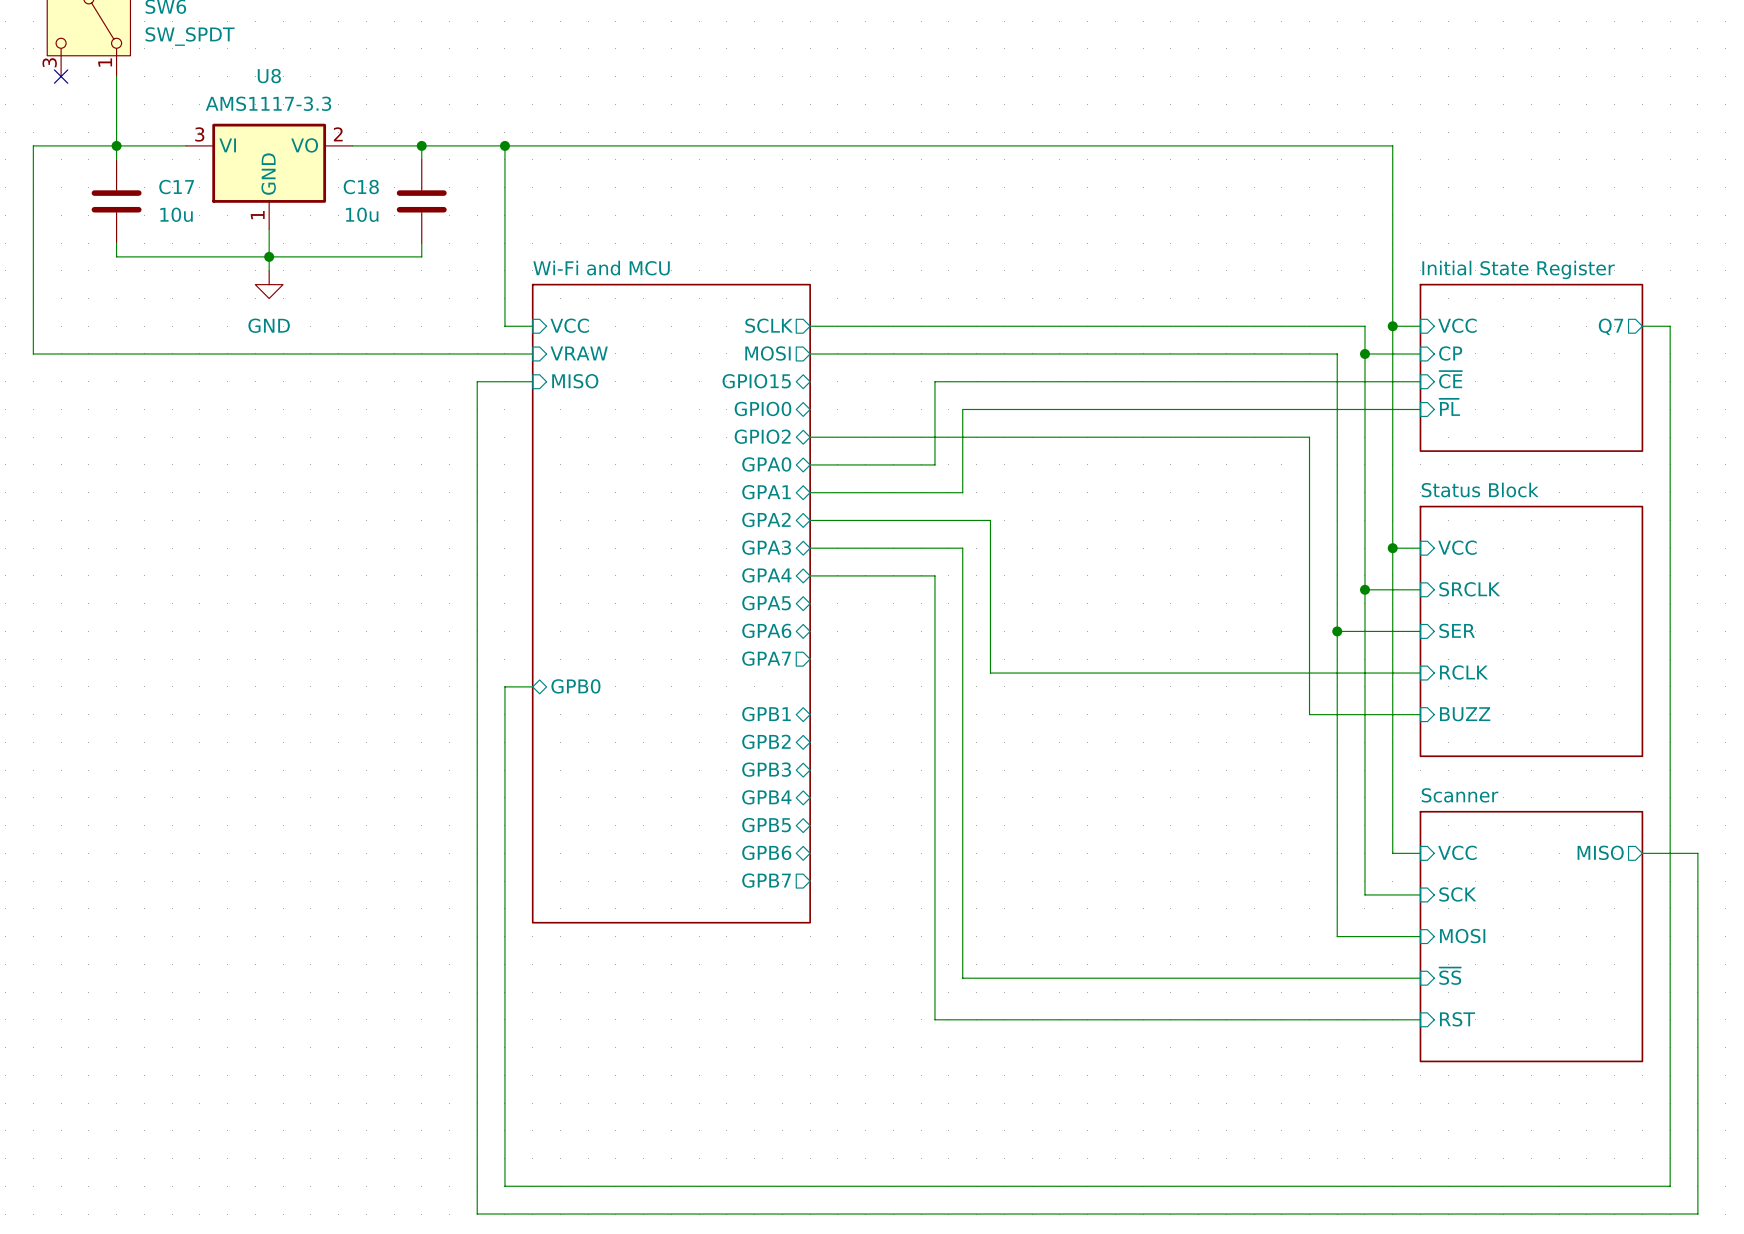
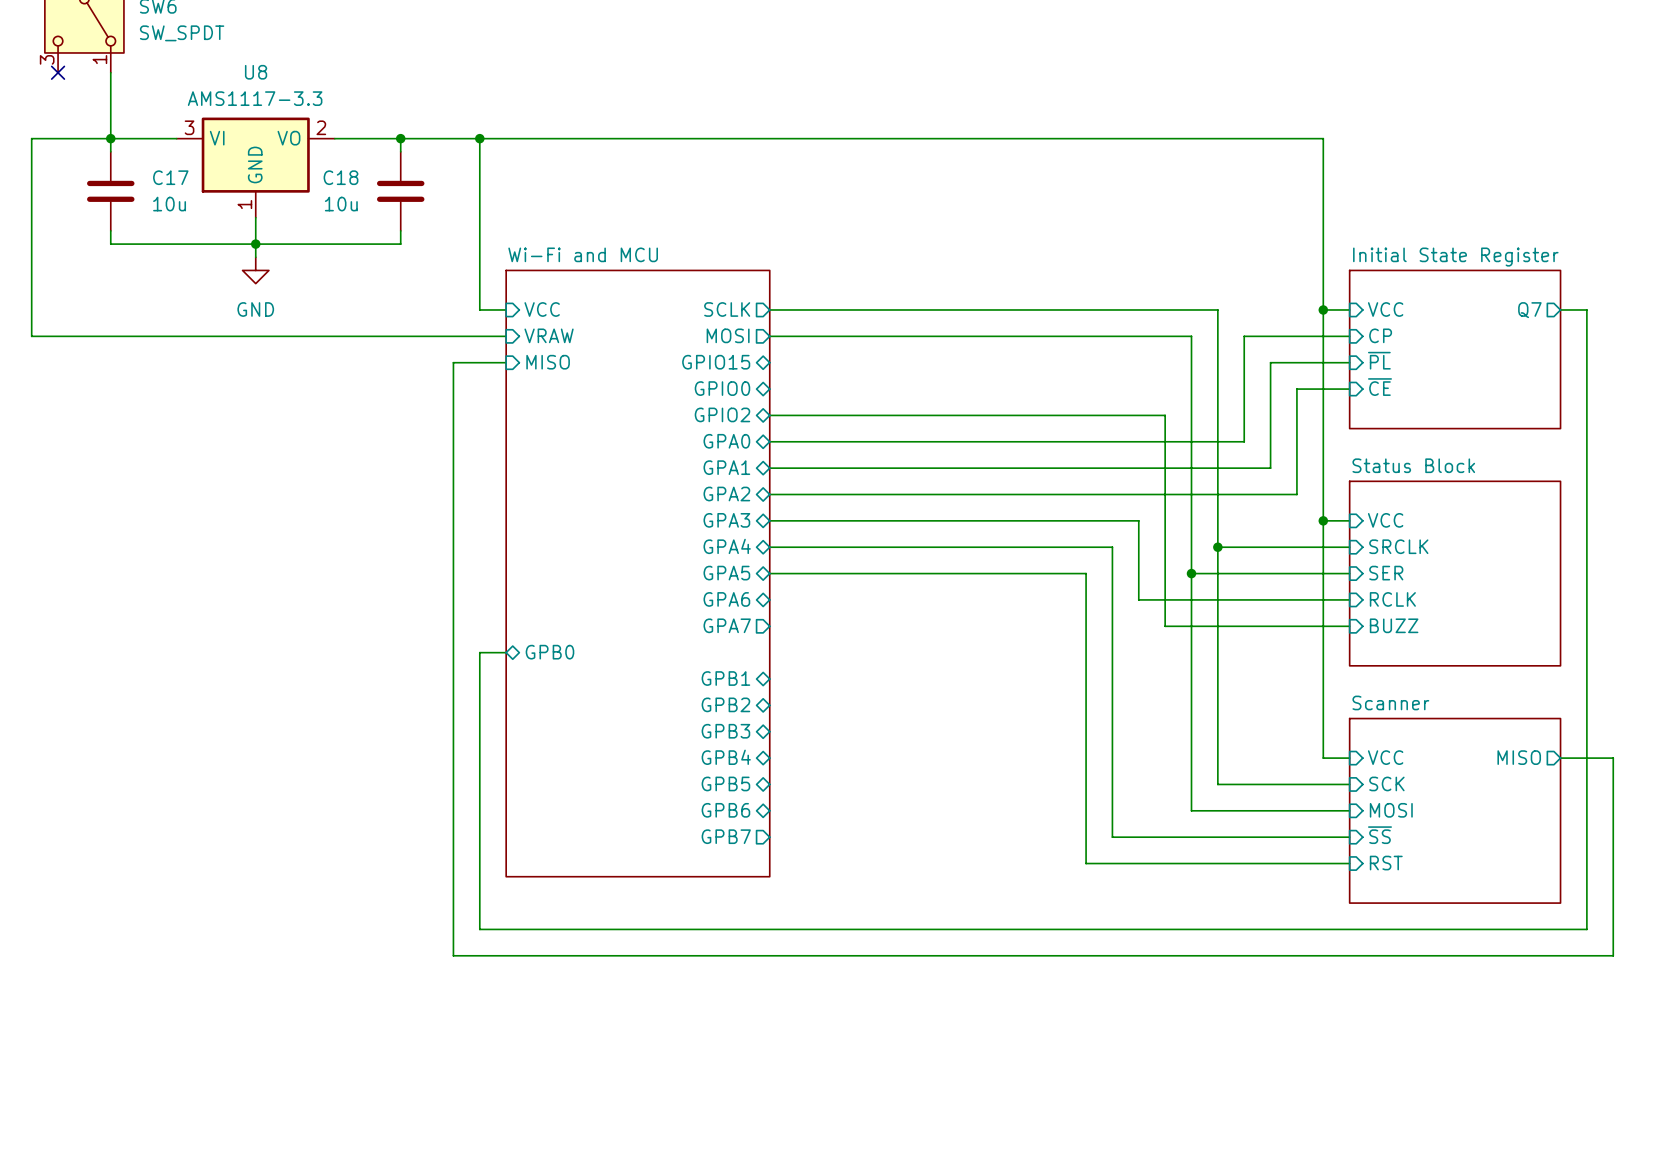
wire: (1281, 326) (1364, 326) (1364, 409) (962, 409) (962, 492) -> (1270, 468) (914, 468)
wire: none -> (1217, 309) (1217, 784) (1349, 784)
wire: (1254, 353) (1309, 353) -> (1244, 415) (1244, 336)
wire: none -> (1191, 336) (1191, 810) (1323, 810)
wire: (1337, 353) (1337, 381) (934, 381) (934, 464) -> (1244, 441) (888, 441)
wire: none -> (1270, 336) (1296, 336)
junction: (1364, 353) -> none
sheet pin: ~{CE} (1450, 379) -> ~{PL} (1379, 360)
sheet pin: ~{PL} (1449, 407) -> ~{CE} (1379, 387)
wire: (1226, 437) (1309, 437) -> (1165, 415) (1165, 626) (1349, 626)
wire: (1309, 464) (1309, 714) (1420, 714) -> none
wire: (1337, 492) (1337, 936) (1420, 936) -> none
wire: (990, 520) (990, 673) (1420, 673) -> (941, 494) (1296, 494)
wire: (1364, 520) (1364, 894) (1420, 894) -> none
wire: (962, 548) (962, 978) -> (914, 520) (1138, 520) (1138, 599) (1270, 599)
wire: (934, 575) (934, 1019) (1420, 1019) -> (888, 547) (1112, 547) (1112, 837) (1349, 837)
wire: none -> (1217, 547) (1349, 547)
junction: none -> (1217, 547)
wire: (1364, 589) (1420, 589) -> none
junction: (1364, 589) -> none
sheet pin position: SRCLK (1469, 589) -> SRCLK (1398, 546)
wire: none -> (769, 573) (1086, 573) (1086, 863) (1349, 863)
wire: none -> (1191, 573) (1349, 573)
junction: none -> (1191, 573)
sheet pin: none -> SER (1386, 573)
sheet Status Block: none -> (1455, 573)
sheet pin: SER (1457, 630) -> RCLK (1392, 599)
junction: (1337, 631) -> none
sheet Status Block: (1531, 631) -> none
sheet pin: RCLK (1464, 672) -> none
sheet pin position: BUZZ (1465, 714) -> BUZZ (1394, 625)
wire: (1392, 797) (1392, 853) -> (1323, 758) (1349, 758)
sheet pin: none -> VCC (1385, 757)
sheet pin: VCC (1457, 852) -> MOSI (1391, 810)
sheet pin position: MISO (1600, 852) -> MISO (1519, 757)
sheet Scanner: none -> (1455, 810)
wire: (1642, 853) (1697, 853) -> (1560, 758) (1613, 758) (1613, 810)
sheet pin position: SCK (1457, 894) -> SCK (1386, 783)
sheet pin: MOSI (1462, 936) -> none
sheet Scanner: (1531, 936) -> none
sheet pin position: ~{SS} (1450, 976) -> ~{SS} (1379, 835)
wire: (504, 978) (504, 1186) (1670, 1186) (1670, 978) -> (479, 929) (914, 929)
wire: none -> (1349, 929) (1586, 929)
wire: (477, 1005) (477, 1214) (1697, 1214) (1697, 1005) -> (453, 955) (1613, 955)
sheet pin position: RST (1457, 1019) -> RST (1386, 863)

